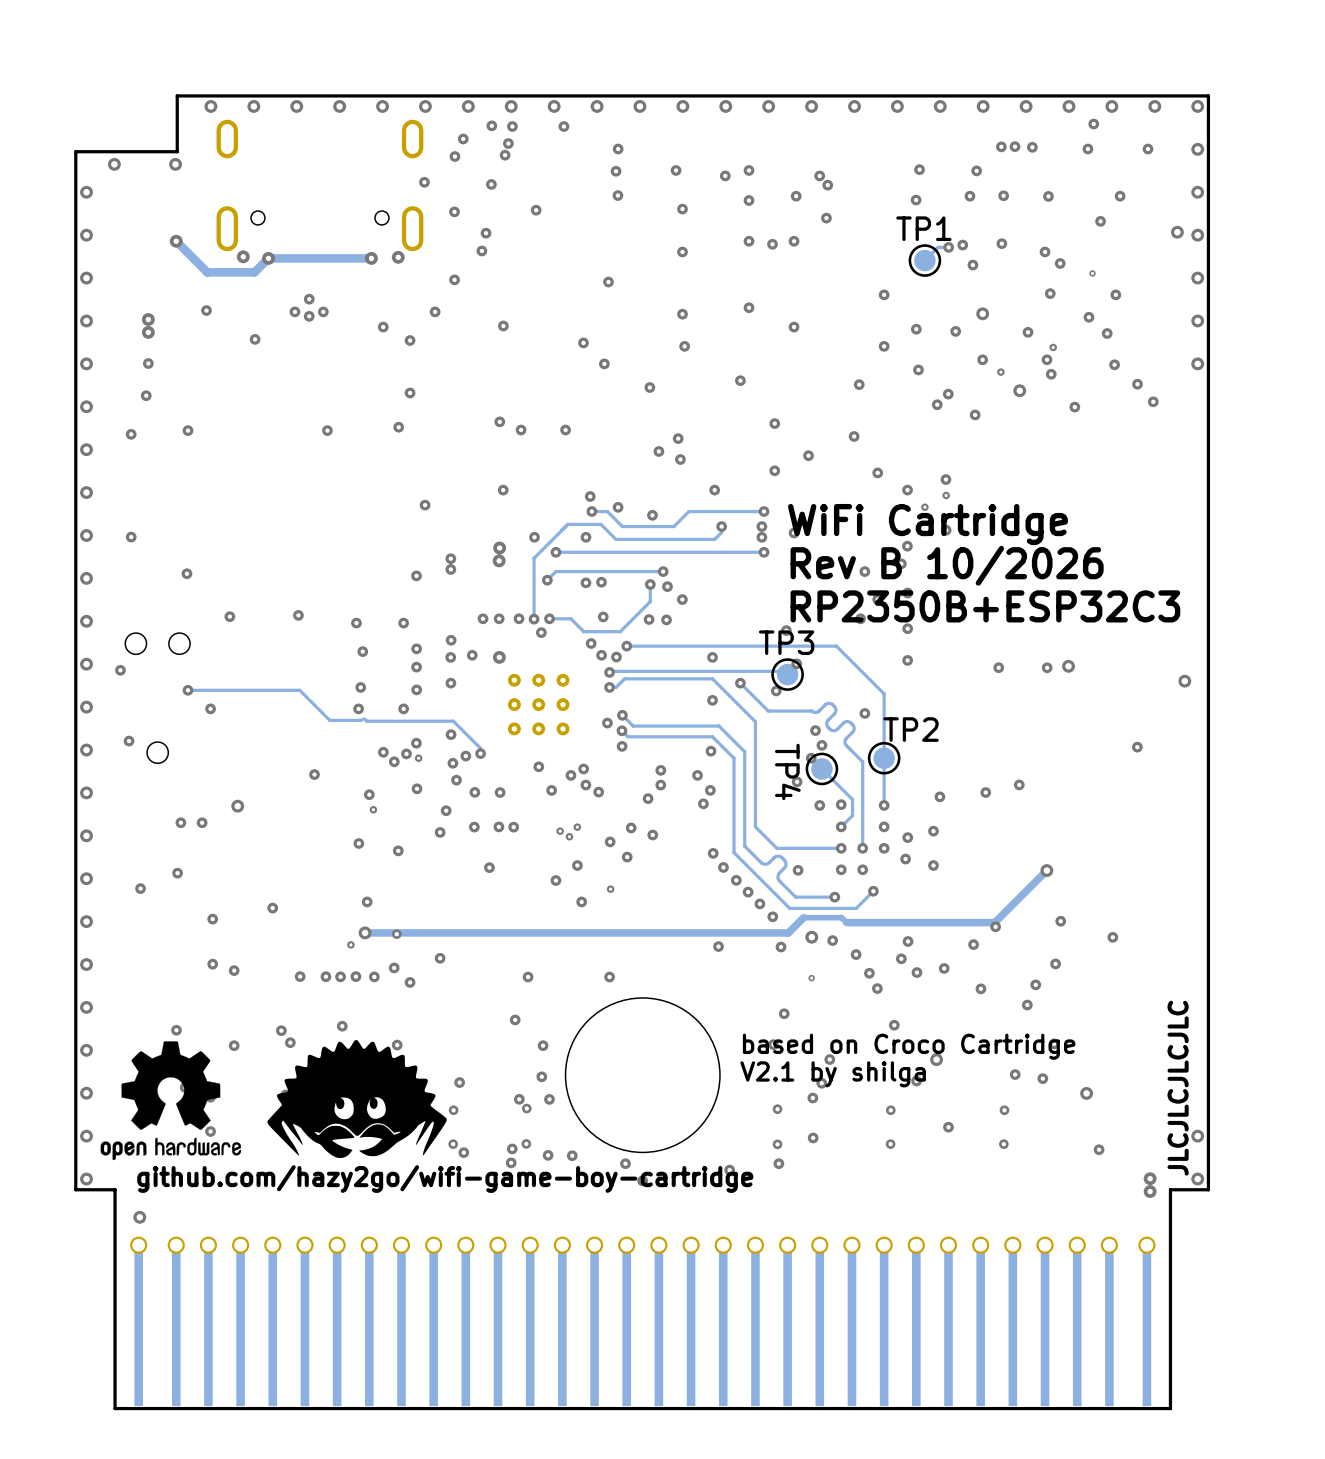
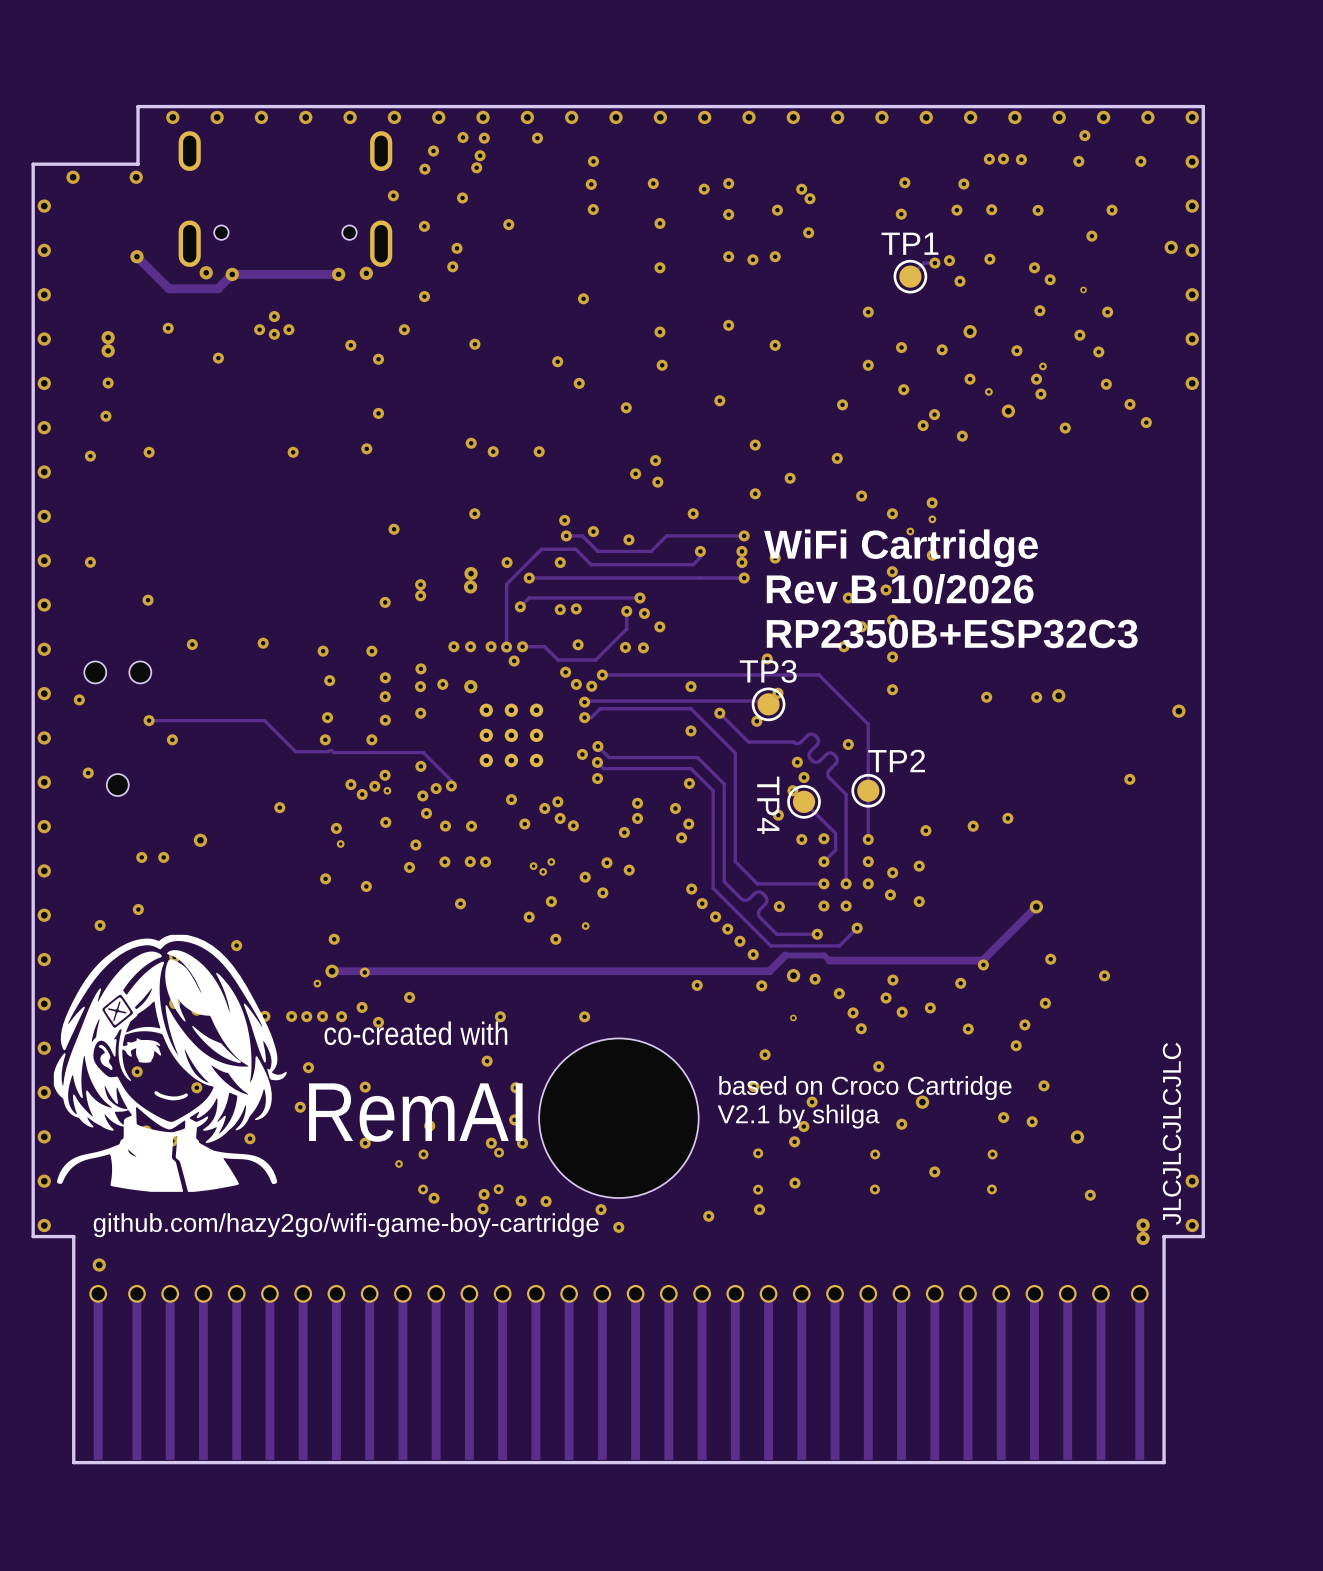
drawing: none -> [53, 934, 287, 1192]
text: none -> co-created with (415, 1033)
drawing: [267, 1040, 447, 1159] -> none
drawing: [100, 1041, 242, 1161] -> none
text: none -> RemAI (415, 1112)

